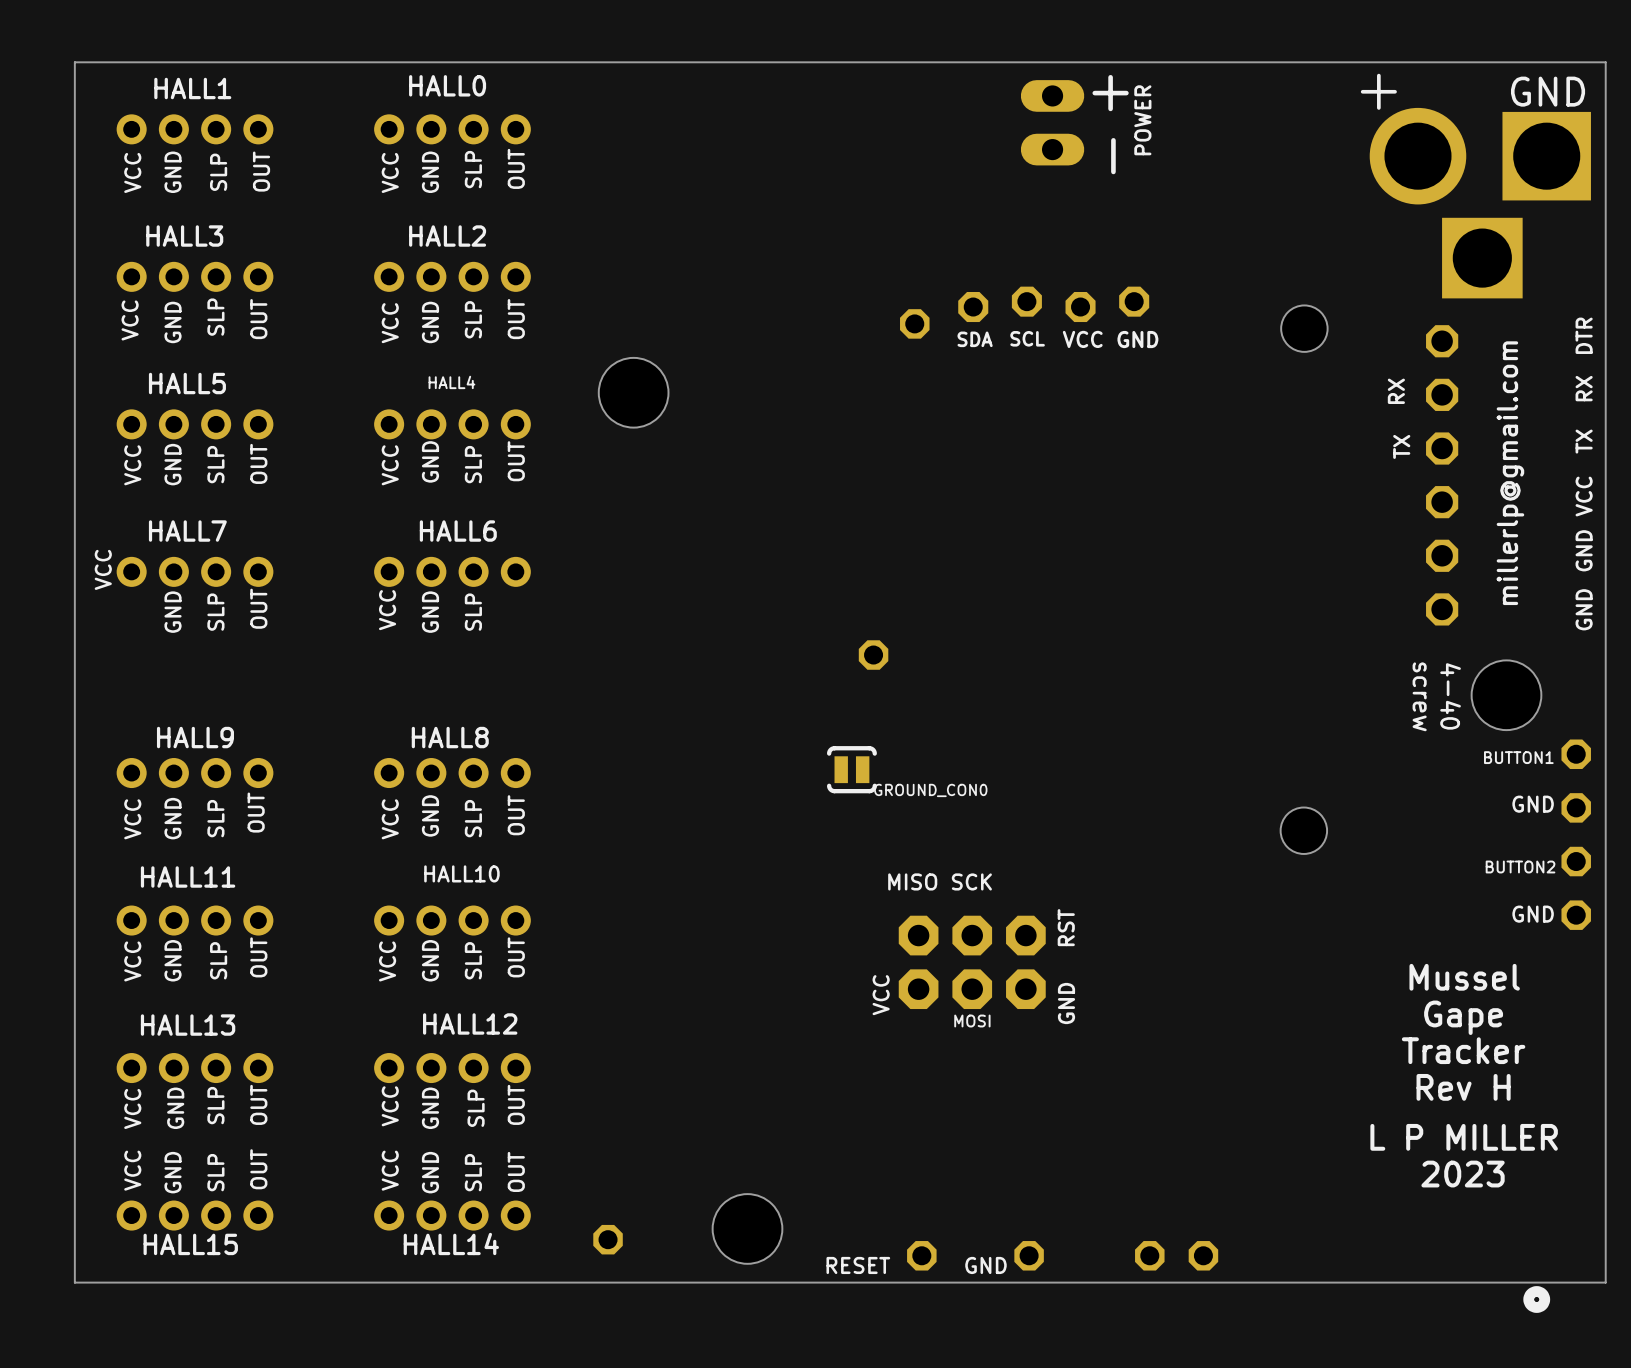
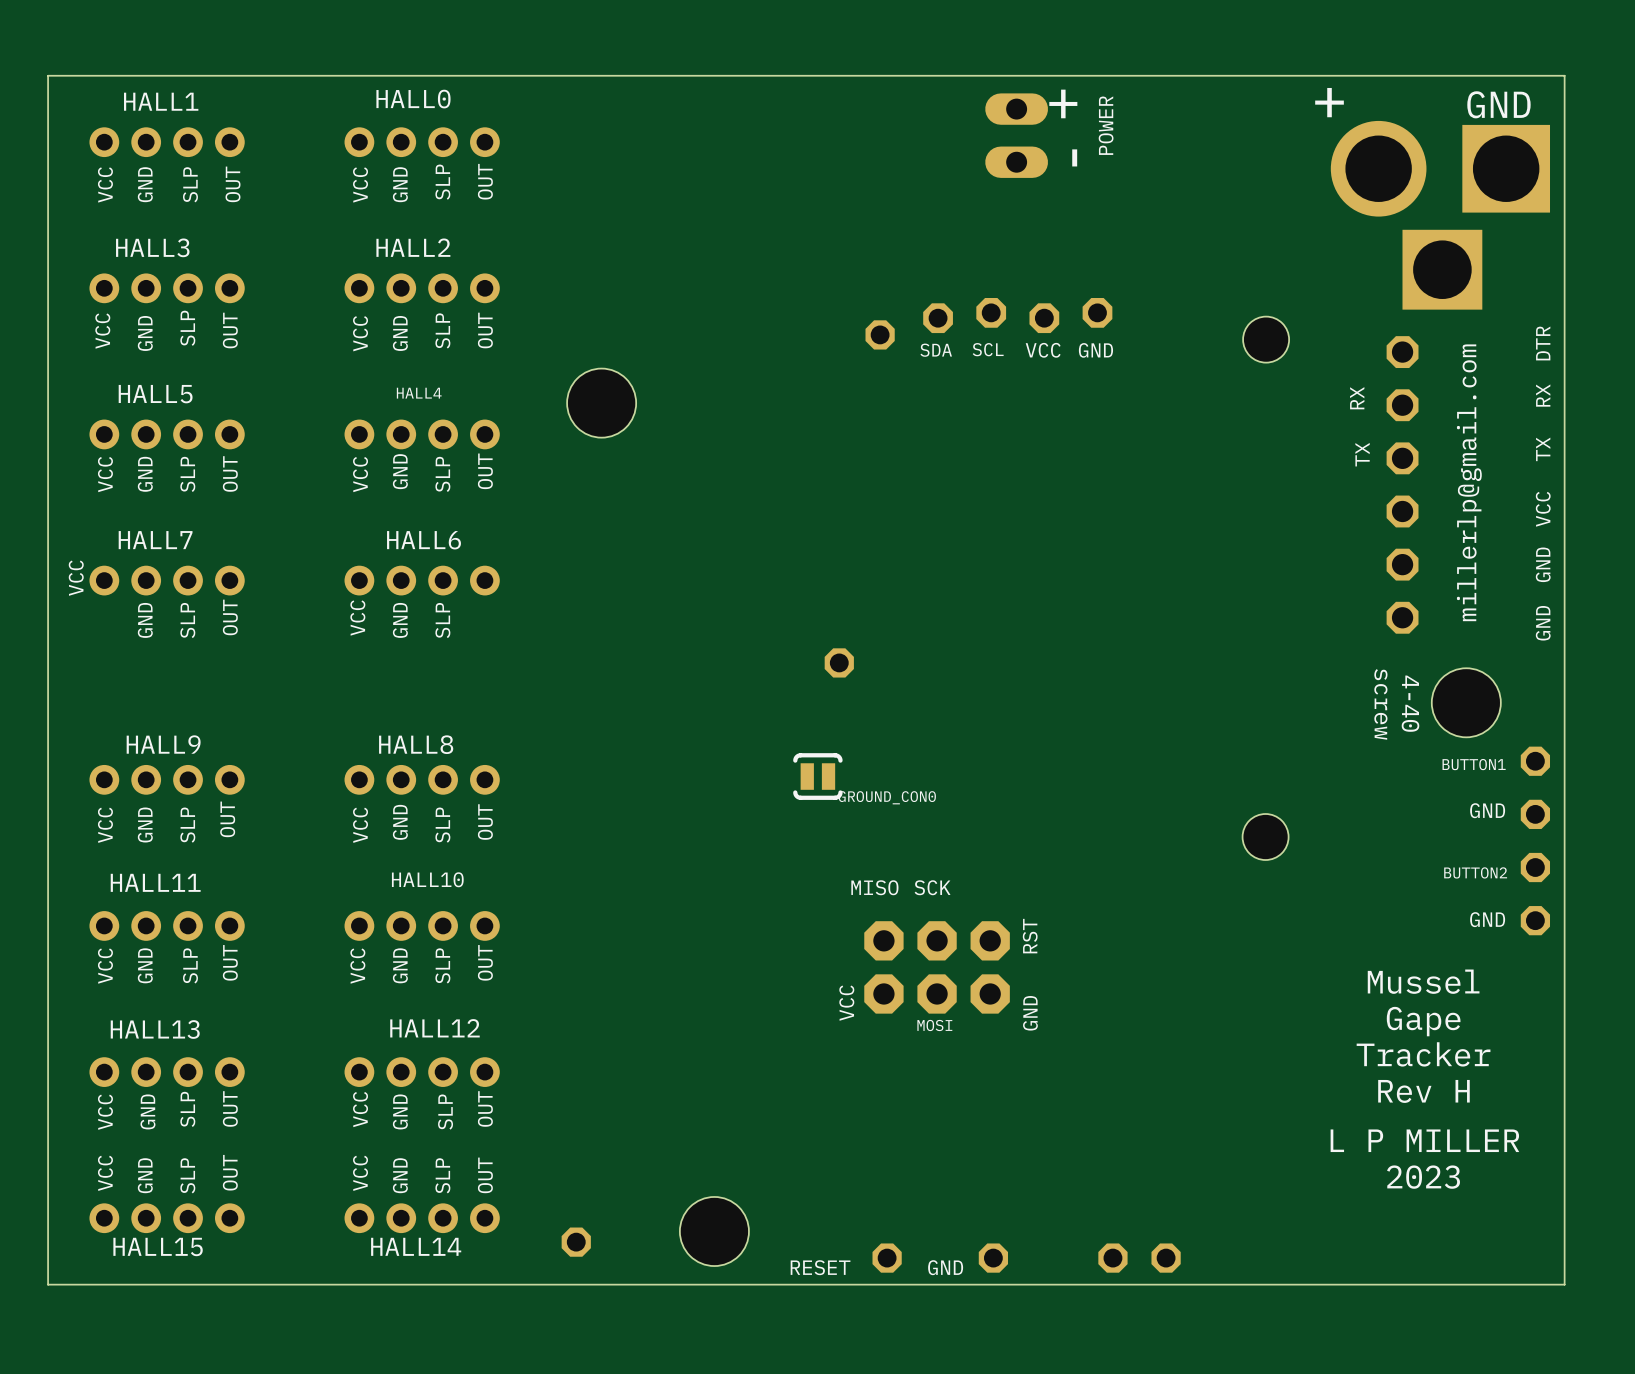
part: (1536, 1299) -> none

